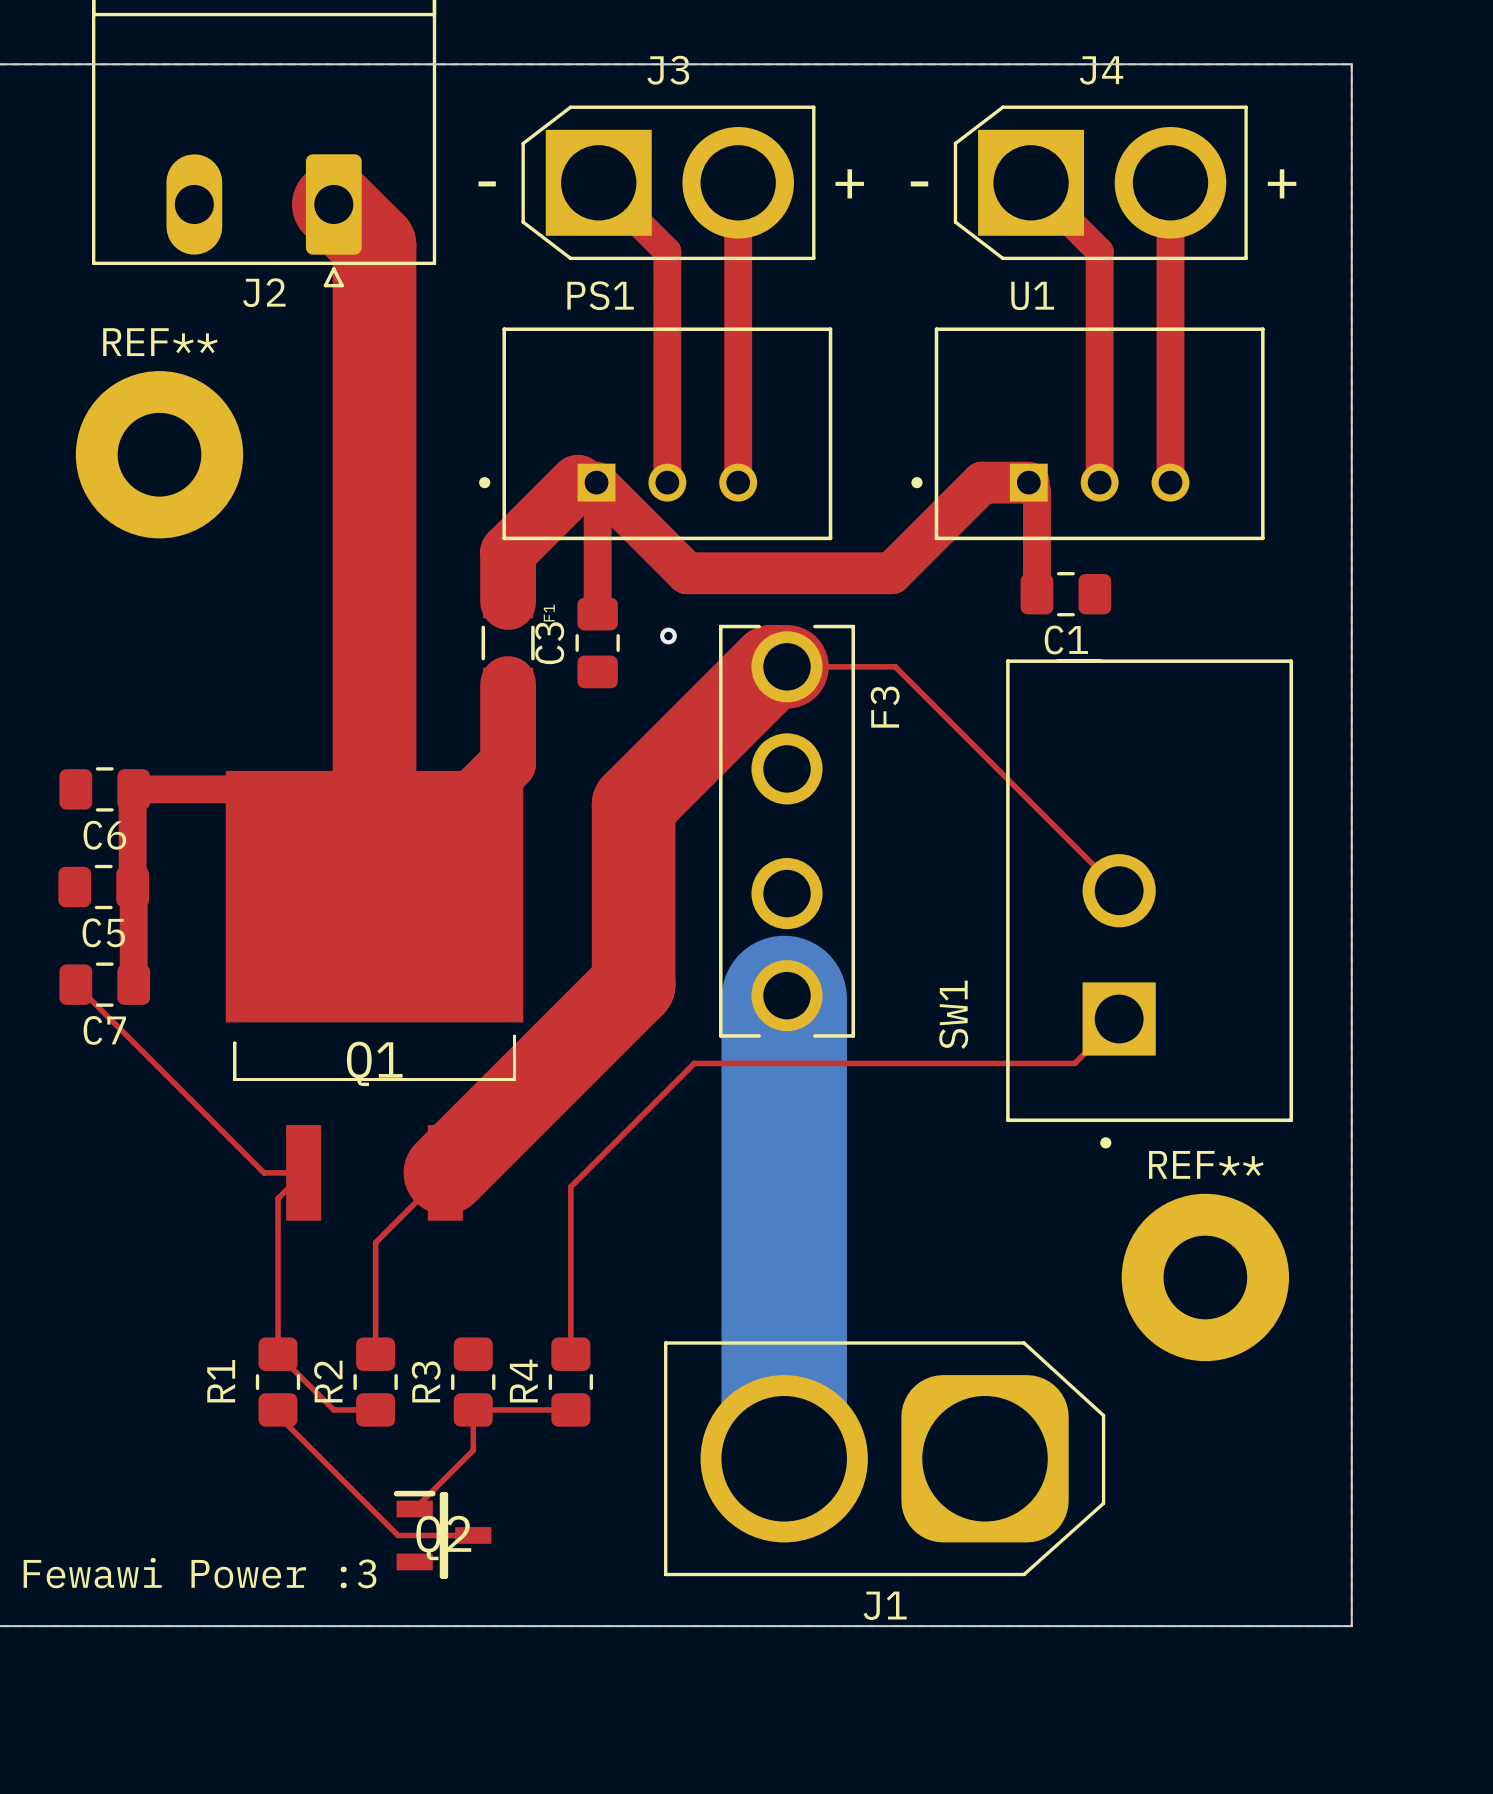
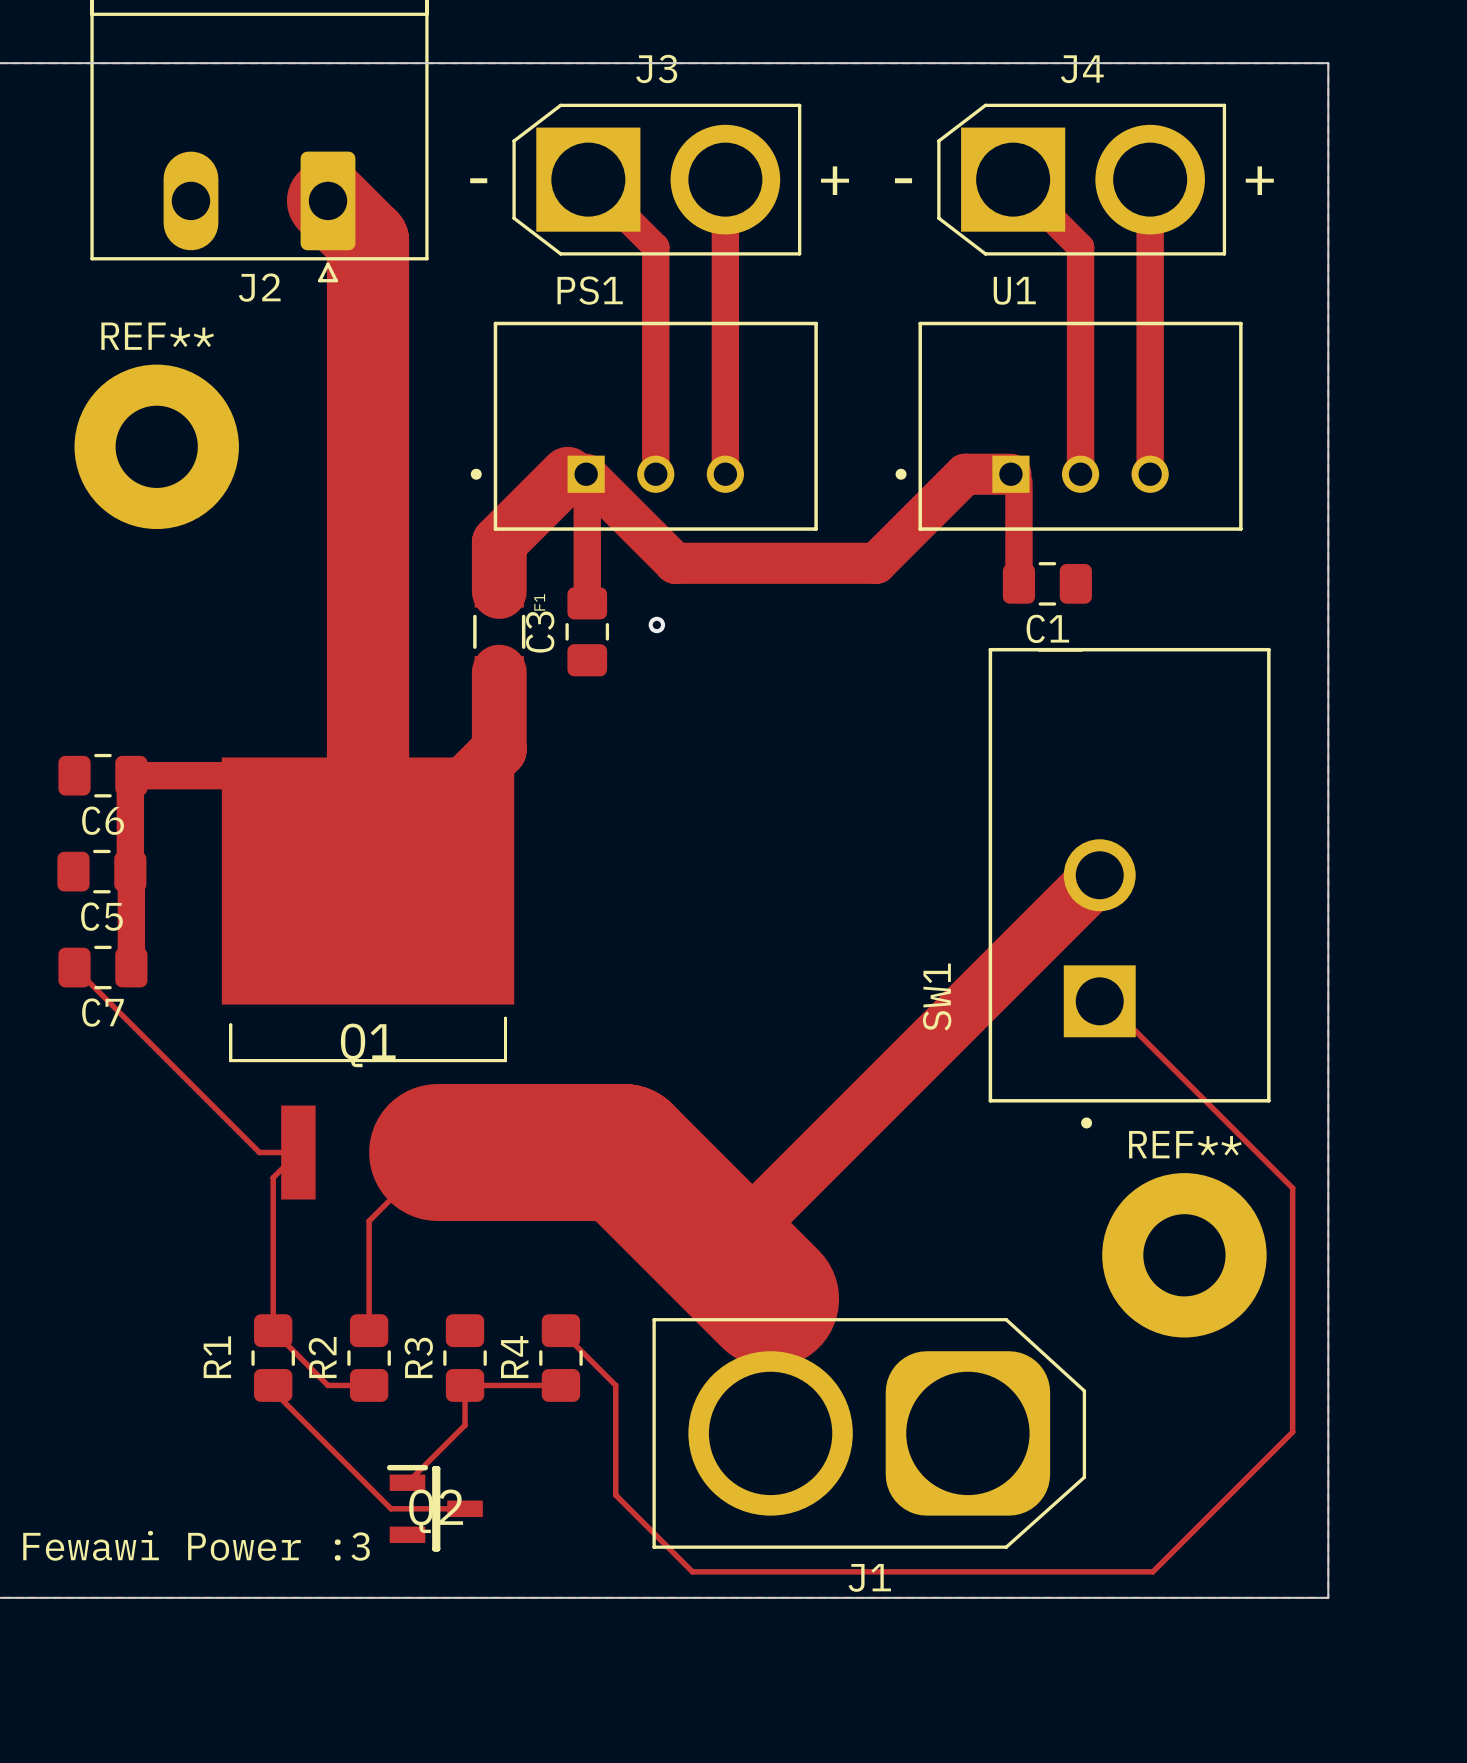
F3: (787, 831) -> none
top track: (1119, 890) (895, 666) (771, 666) (633, 804) (633, 984) (445, 1172) -> (1099, 875) (770, 1204) (770, 1299) (623, 1152) (437, 1152)
bottom track: (787, 995) (784, 998) (784, 1458) -> none
top track: (1119, 1019) (1074, 1063) (694, 1063) (570, 1186) (570, 1354) -> (1099, 1001) (1105, 1001) (1292, 1188) (1292, 1432) (1152, 1571) (692, 1571) (615, 1495) (615, 1385) (560, 1330)

